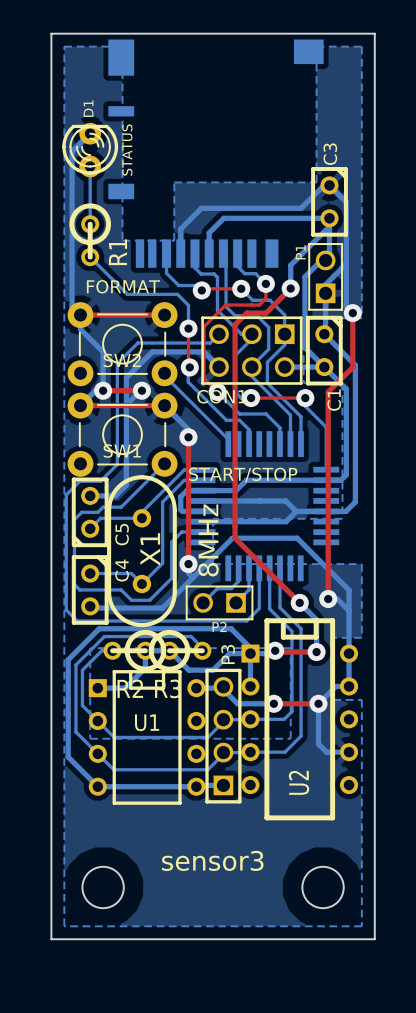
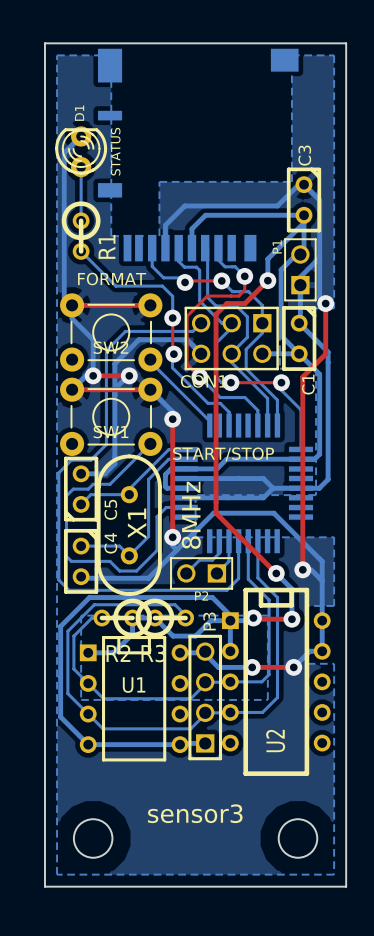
bottom track: (318, 703) (318, 743) (326, 752) (349, 752) -> none

